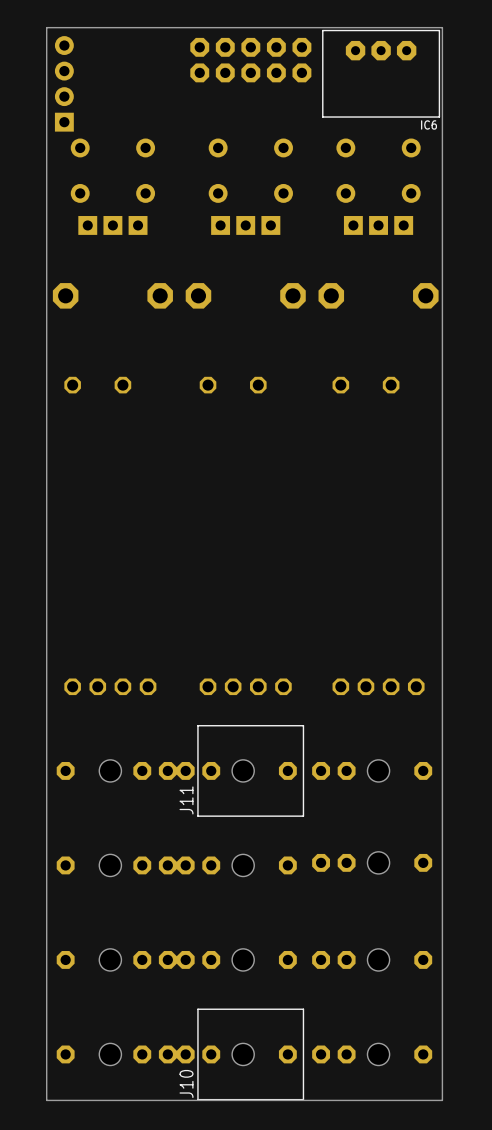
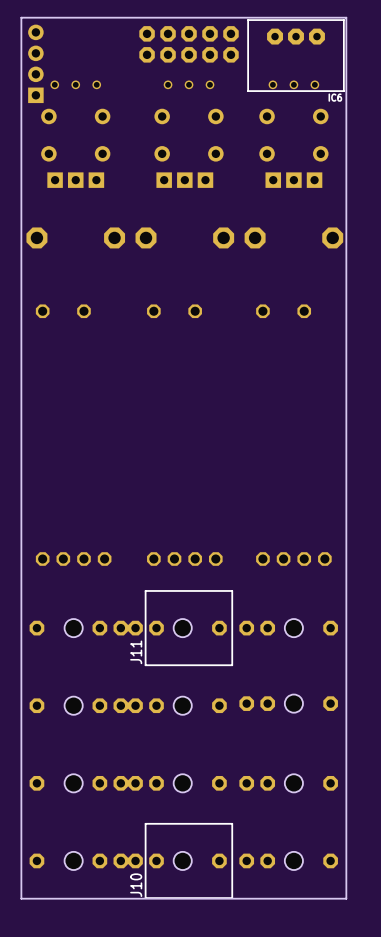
part: none -> (75, 84)
part: none -> (189, 84)
part: none -> (293, 84)

